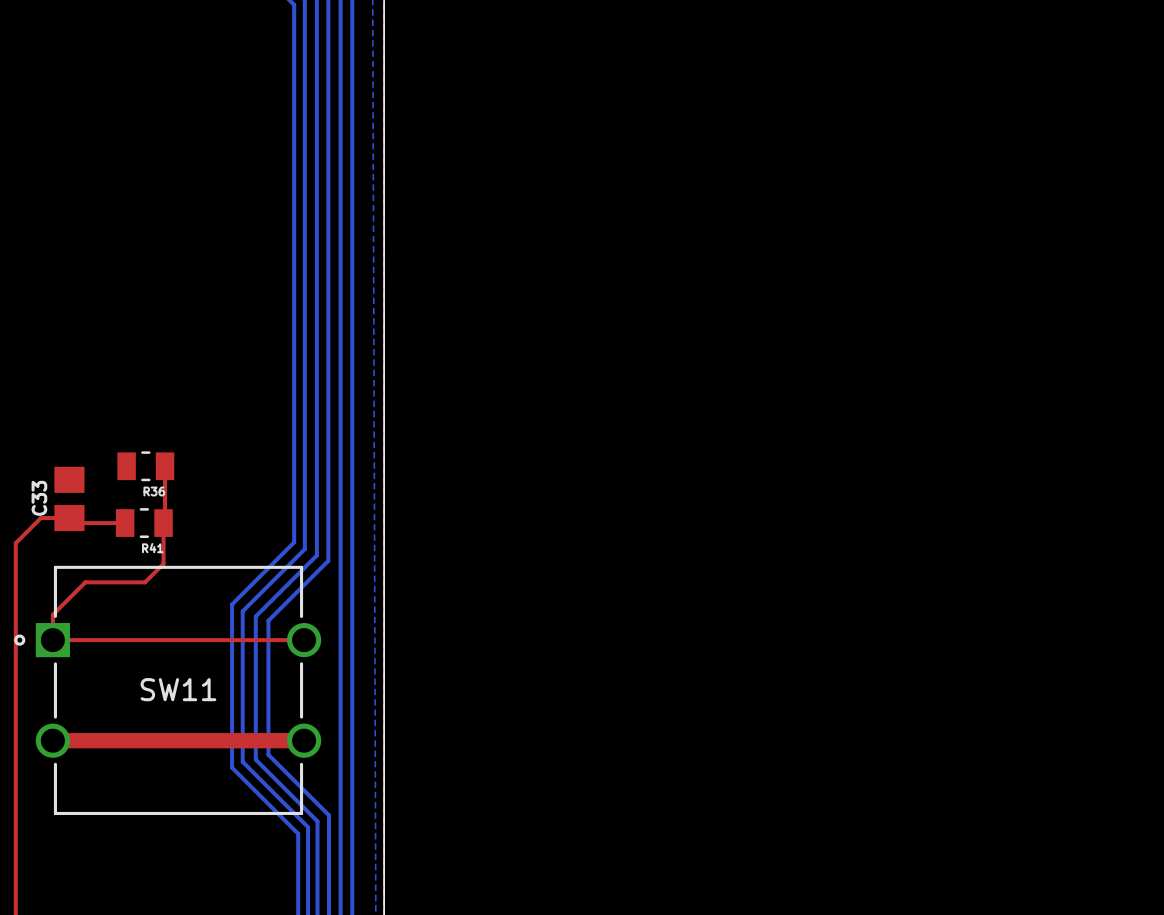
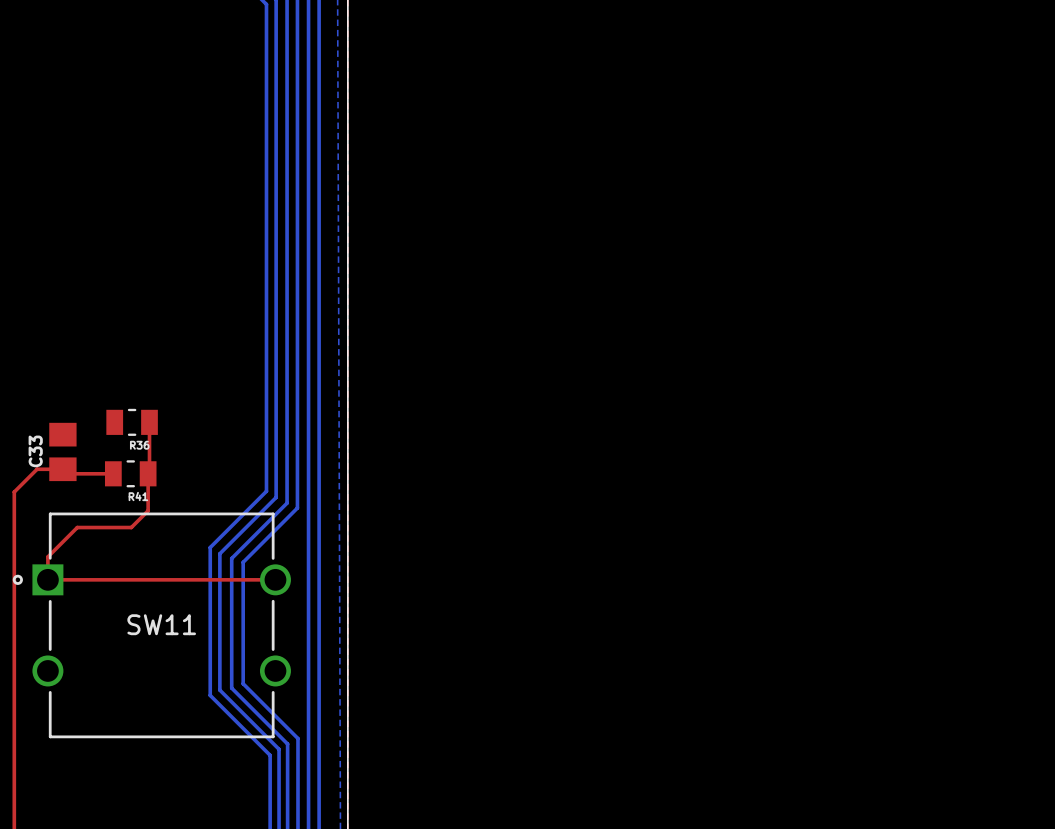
top track: (52, 740) (304, 740) -> none

